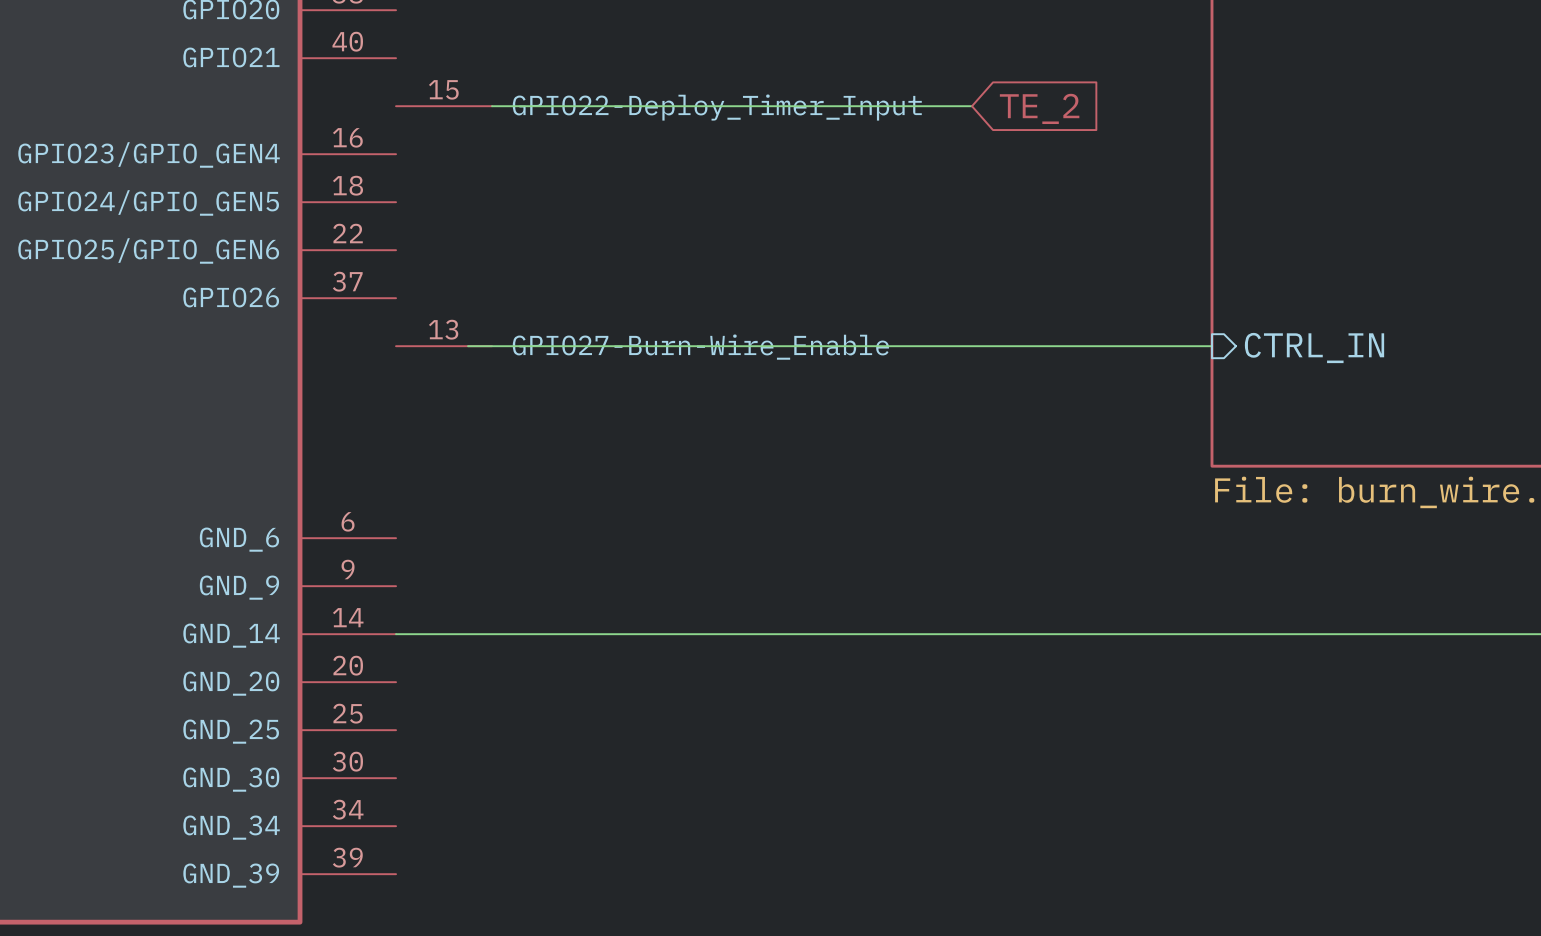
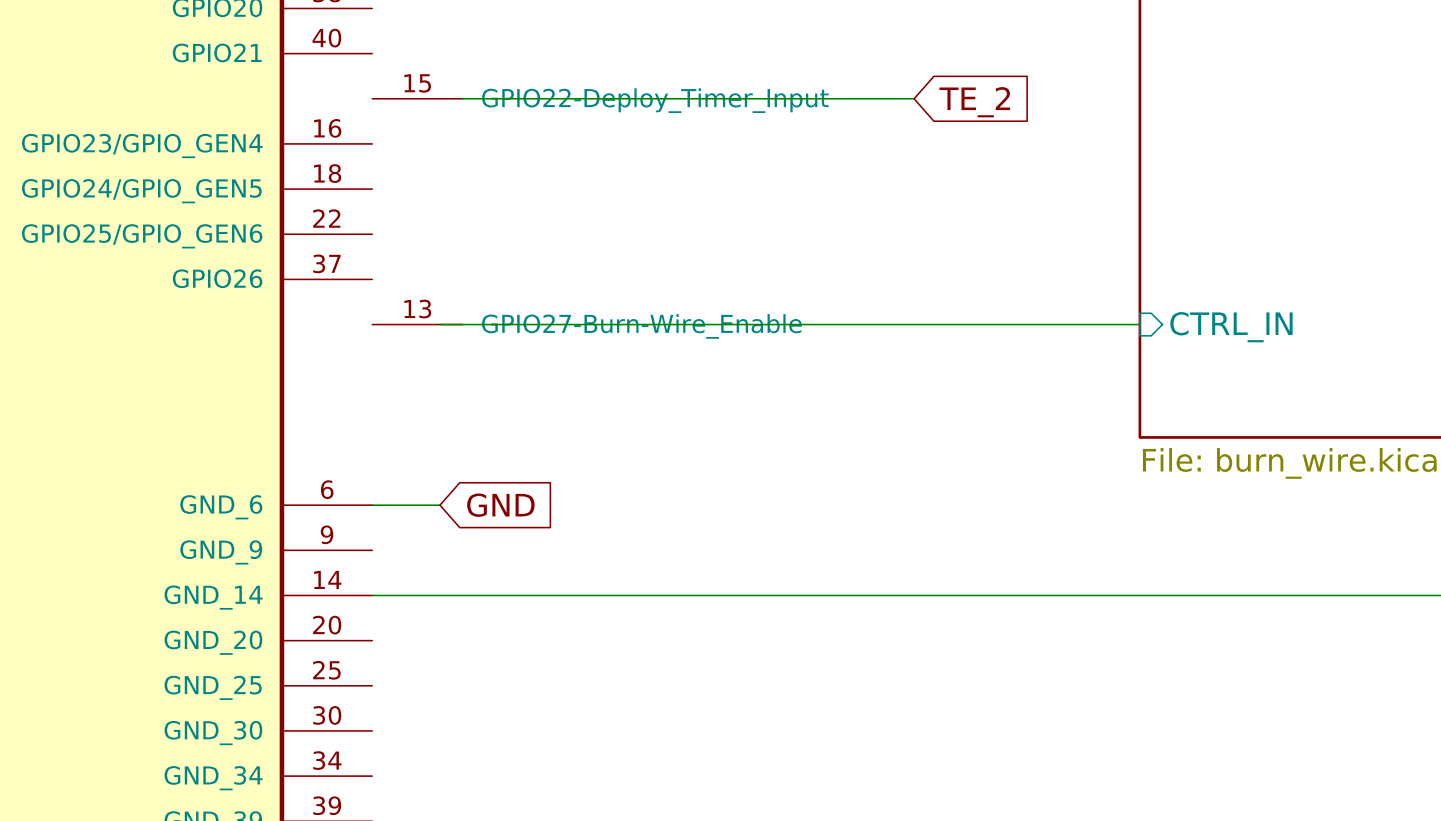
wire: none -> (372, 505) (439, 505)
global label: none -> GND (500, 505)

